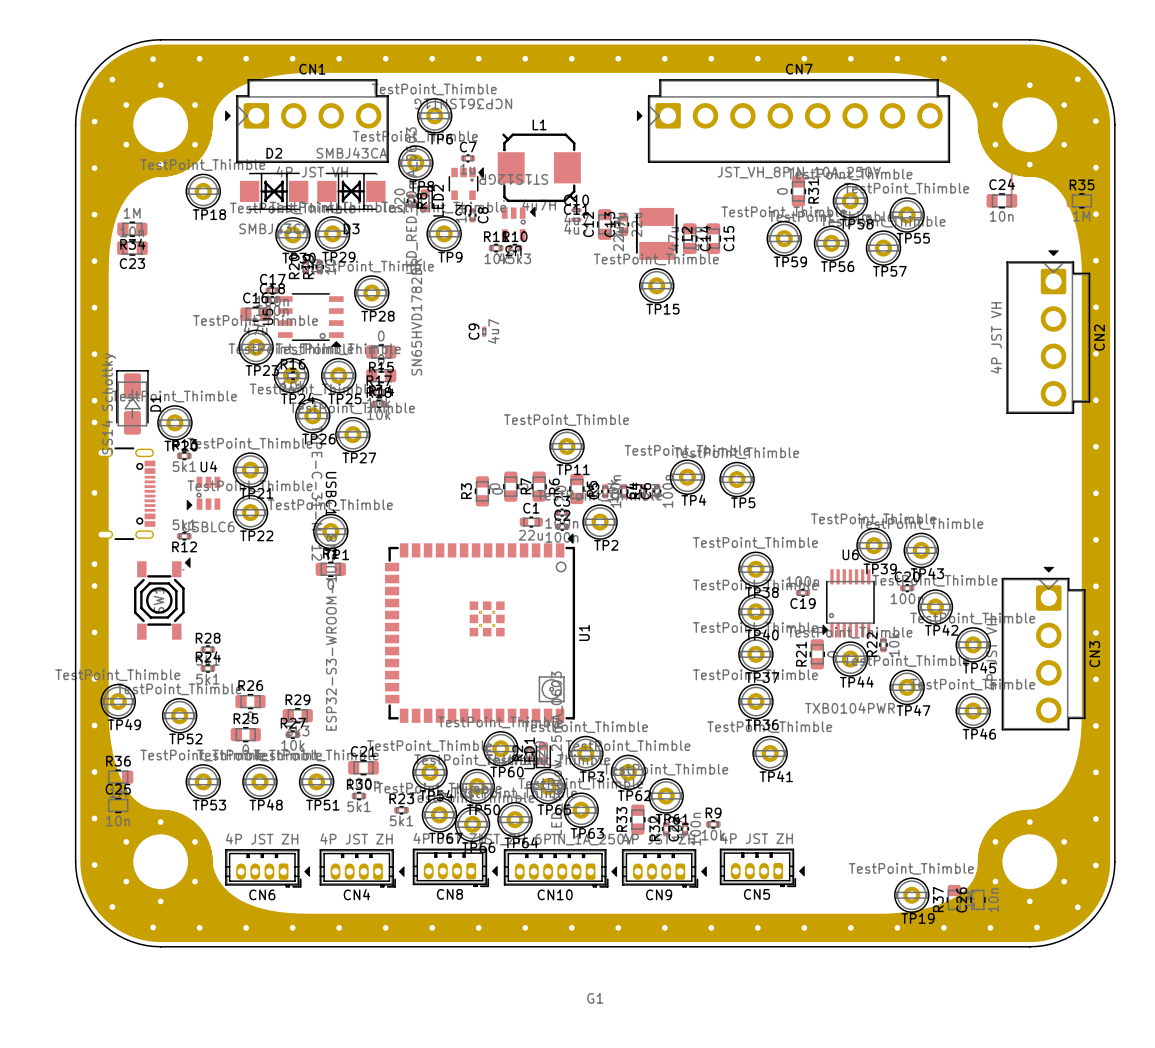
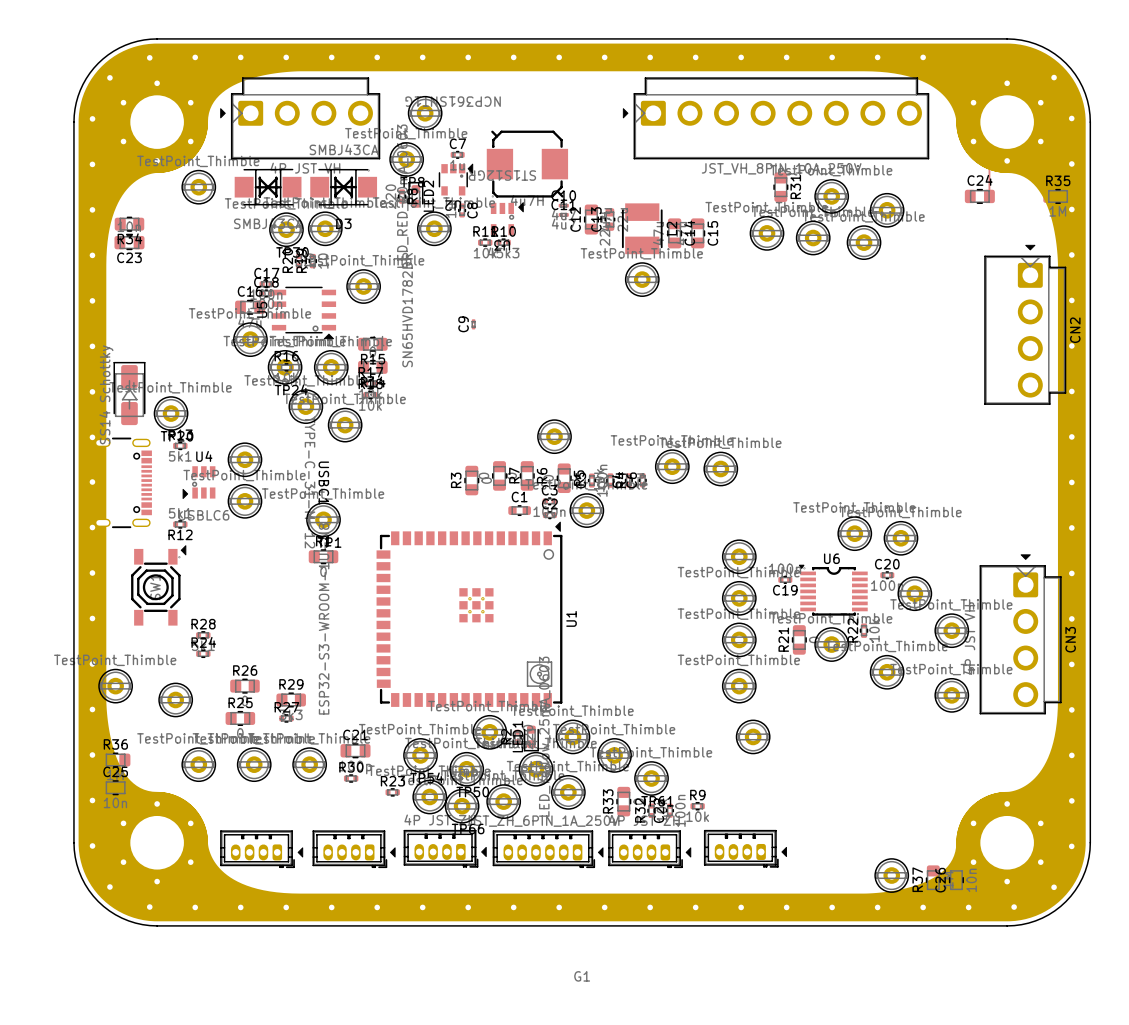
G1 footprint: [75, 39, 1116, 948] -> [73, 38, 1091, 927]
CN1 name: CN1 (312, 69) -> none
CN7 name: CN7 (799, 69) -> none
TP6 value: TestPoint_Thimble (434, 89) -> none
L1 name: L1 (539, 124) -> none
TP6 name: TP6 (440, 139) -> none
D2 name: D2 (274, 153) -> none
TP55 value: TestPoint_Thimble (906, 188) -> none
R31 value: 0 (782, 191) -> none
R34 value: 1M (132, 213) -> none
TP18 name: TP18 (209, 214) -> none
C24 value: 10n (1001, 216) -> none
TP58 name: TP58 (856, 224) -> none
TP55 name: TP55 (913, 238) -> none
TP29 name: TP29 (338, 257) -> none
TP9 name: TP9 (450, 257) -> none
TP59 name: TP59 (790, 261) -> none
TP56 name: TP56 (837, 266) -> none
TP57 name: TP57 (889, 271) -> none
TP15 name: TP15 (662, 309) -> none
TP28 name: TP28 (377, 316) -> none
C9 value: 4u7 (493, 331) -> none
R15 value: 0 (381, 336) -> none
CN2 value: 4P JST VH (996, 337) -> none
TP23 name: TP23 (262, 370) -> none
TP25 name: TP25 (344, 398) -> none
D1 name: D1 (155, 403) -> none
TP11 value: TestPoint_Thimble (566, 420) -> none
TP26 name: TP26 (318, 439) -> none
TP21 value: TestPoint_Thimble (250, 443) -> none
TP27 name: TP27 (359, 457) -> none
TP11 name: TP11 (573, 469) -> none
C6 value: 100n (667, 491) -> none
TP21 name: TP21 (256, 493) -> none
TP4 name: TP4 (693, 500) -> none
TP5 name: TP5 (743, 502) -> none
TP22 name: TP22 (256, 535) -> none
C1 value: 22u (530, 535) -> none
C2 value: 100n (562, 537) -> none
TP38 value: TestPoint_Thimble (755, 542) -> none
TP2 name: TP2 (606, 545) -> none
TP39 name: TP39 (880, 568) -> none
U6 footprint: [822, 569, 875, 638] -> [798, 564, 868, 616]
TP43 name: TP43 (927, 573) -> none
TP42 value: TestPoint_Thimble (934, 580) -> none
TP38 name: TP38 (762, 592) -> none
TP42 name: TP42 (941, 630) -> none
TP40 name: TP40 (762, 634) -> none
TP45 name: TP45 (979, 667) -> none
TP37 name: TP37 (762, 677) -> none
R24 value: 5k1 (207, 679) -> none
TP44 name: TP44 (856, 682) -> none
TP52 value: TestPoint_Thimble (179, 689) -> none
U6 value: TXB0104PWR (849, 708) -> none
TP47 name: TP47 (913, 710) -> none
TP49 name: TP49 (124, 724) -> none
TP36 name: TP36 (762, 724) -> none
TP41 value: TestPoint_Thimble (769, 727) -> none
TP46 name: TP46 (979, 734) -> none
TP52 name: TP52 (185, 739) -> none
R27 value: 10k (292, 745) -> none
TP60 name: TP60 (507, 772) -> none
TP3 name: TP3 (592, 776) -> none
TP41 name: TP41 (776, 776) -> none
TP62 name: TP62 (634, 795) -> none
TP48 name: TP48 (266, 804) -> none
TP53 name: TP53 (209, 805) -> none
TP51 name: TP51 (322, 805) -> none
R30 value: 5k1 (359, 806) -> none
TP65 name: TP65 (554, 809) -> none
R23 value: 5k1 (401, 820) -> none
TP63 name: TP63 (587, 833) -> none
CN6 value: 4P JST ZH (262, 838) -> none
CN4 value: 4P JST ZH (356, 838) -> none
TP67 name: TP67 (445, 838) -> none
CN5 value: 4P JST ZH (756, 838) -> none
TP64 name: TP64 (521, 842) -> none
TP19 value: TestPoint_Thimble (911, 868) -> none
CN6 name: CN6 (262, 894) -> none
CN4 name: CN4 (357, 894) -> none
CN8 name: CN8 (449, 894) -> none
CN10 name: CN10 (555, 894) -> none
CN9 name: CN9 (659, 894) -> none
CN5 name: CN5 (756, 894) -> none
TP19 name: TP19 (917, 918) -> none

